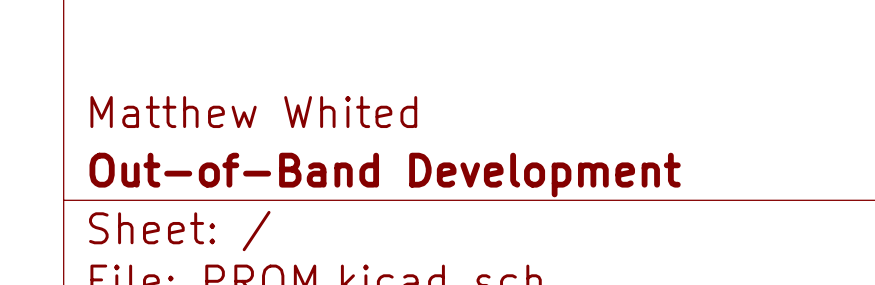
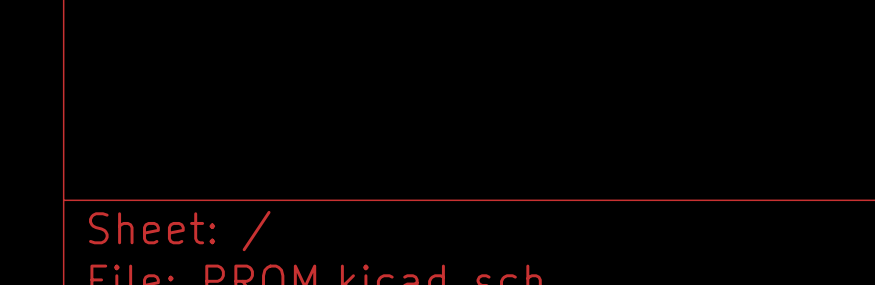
title block: Matthew Whited (253, 112) -> none
title block: Out-of-Band Development (385, 175) -> none

